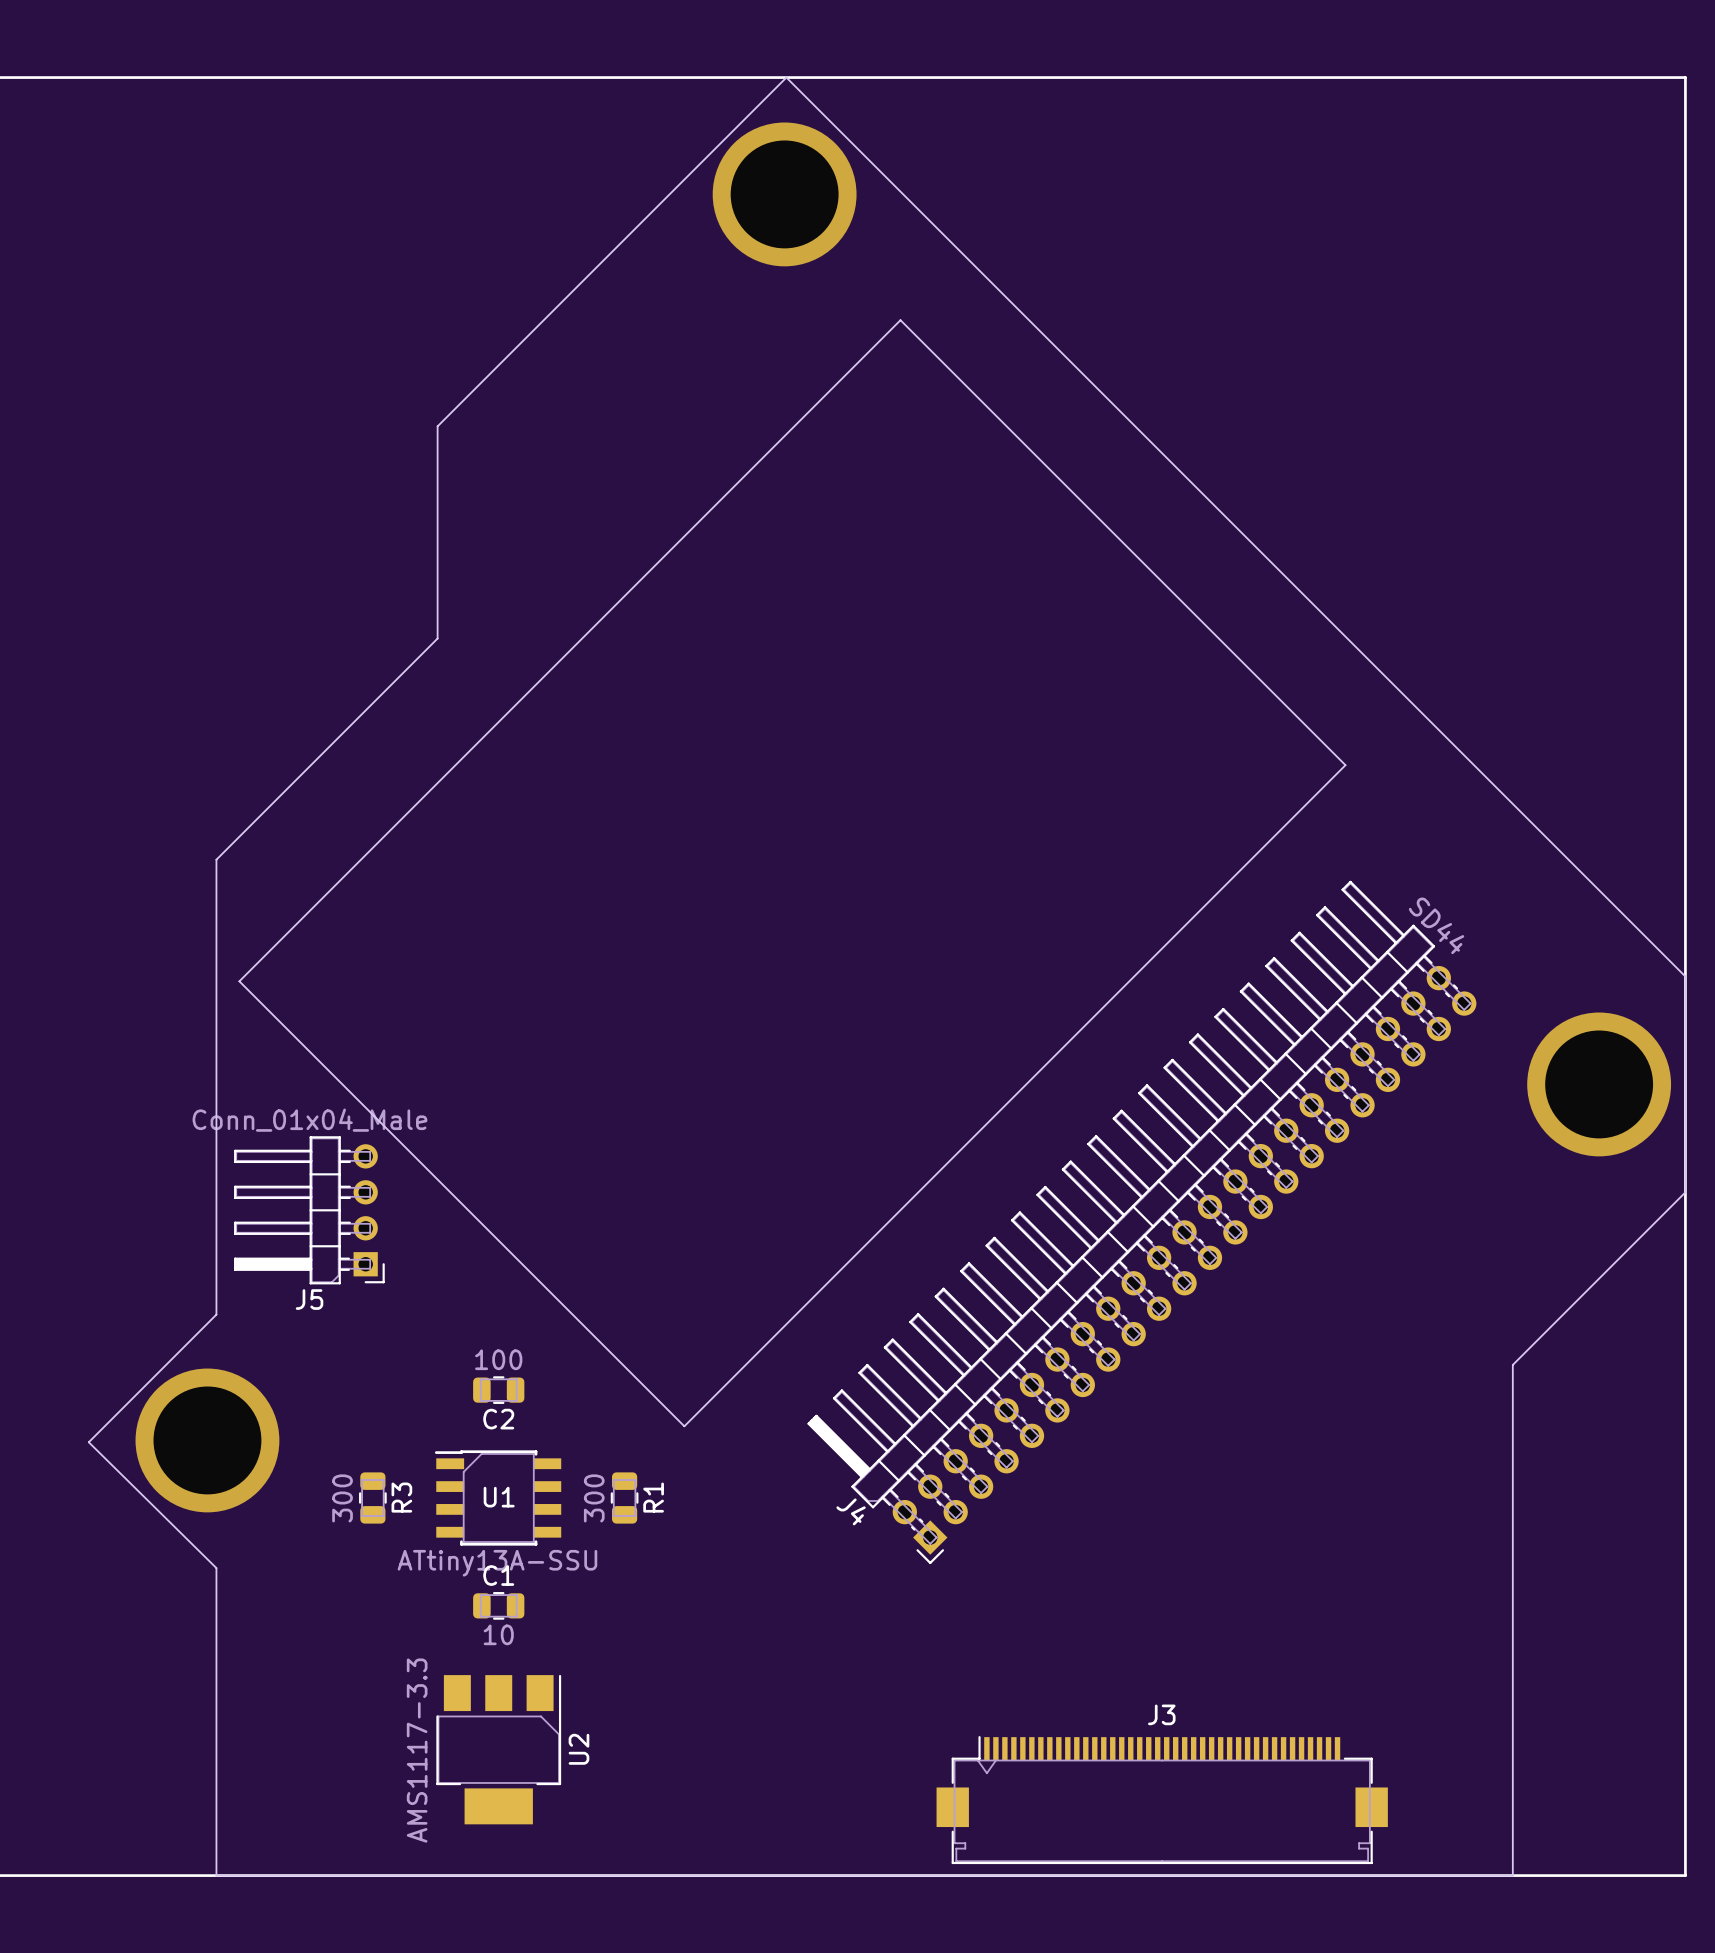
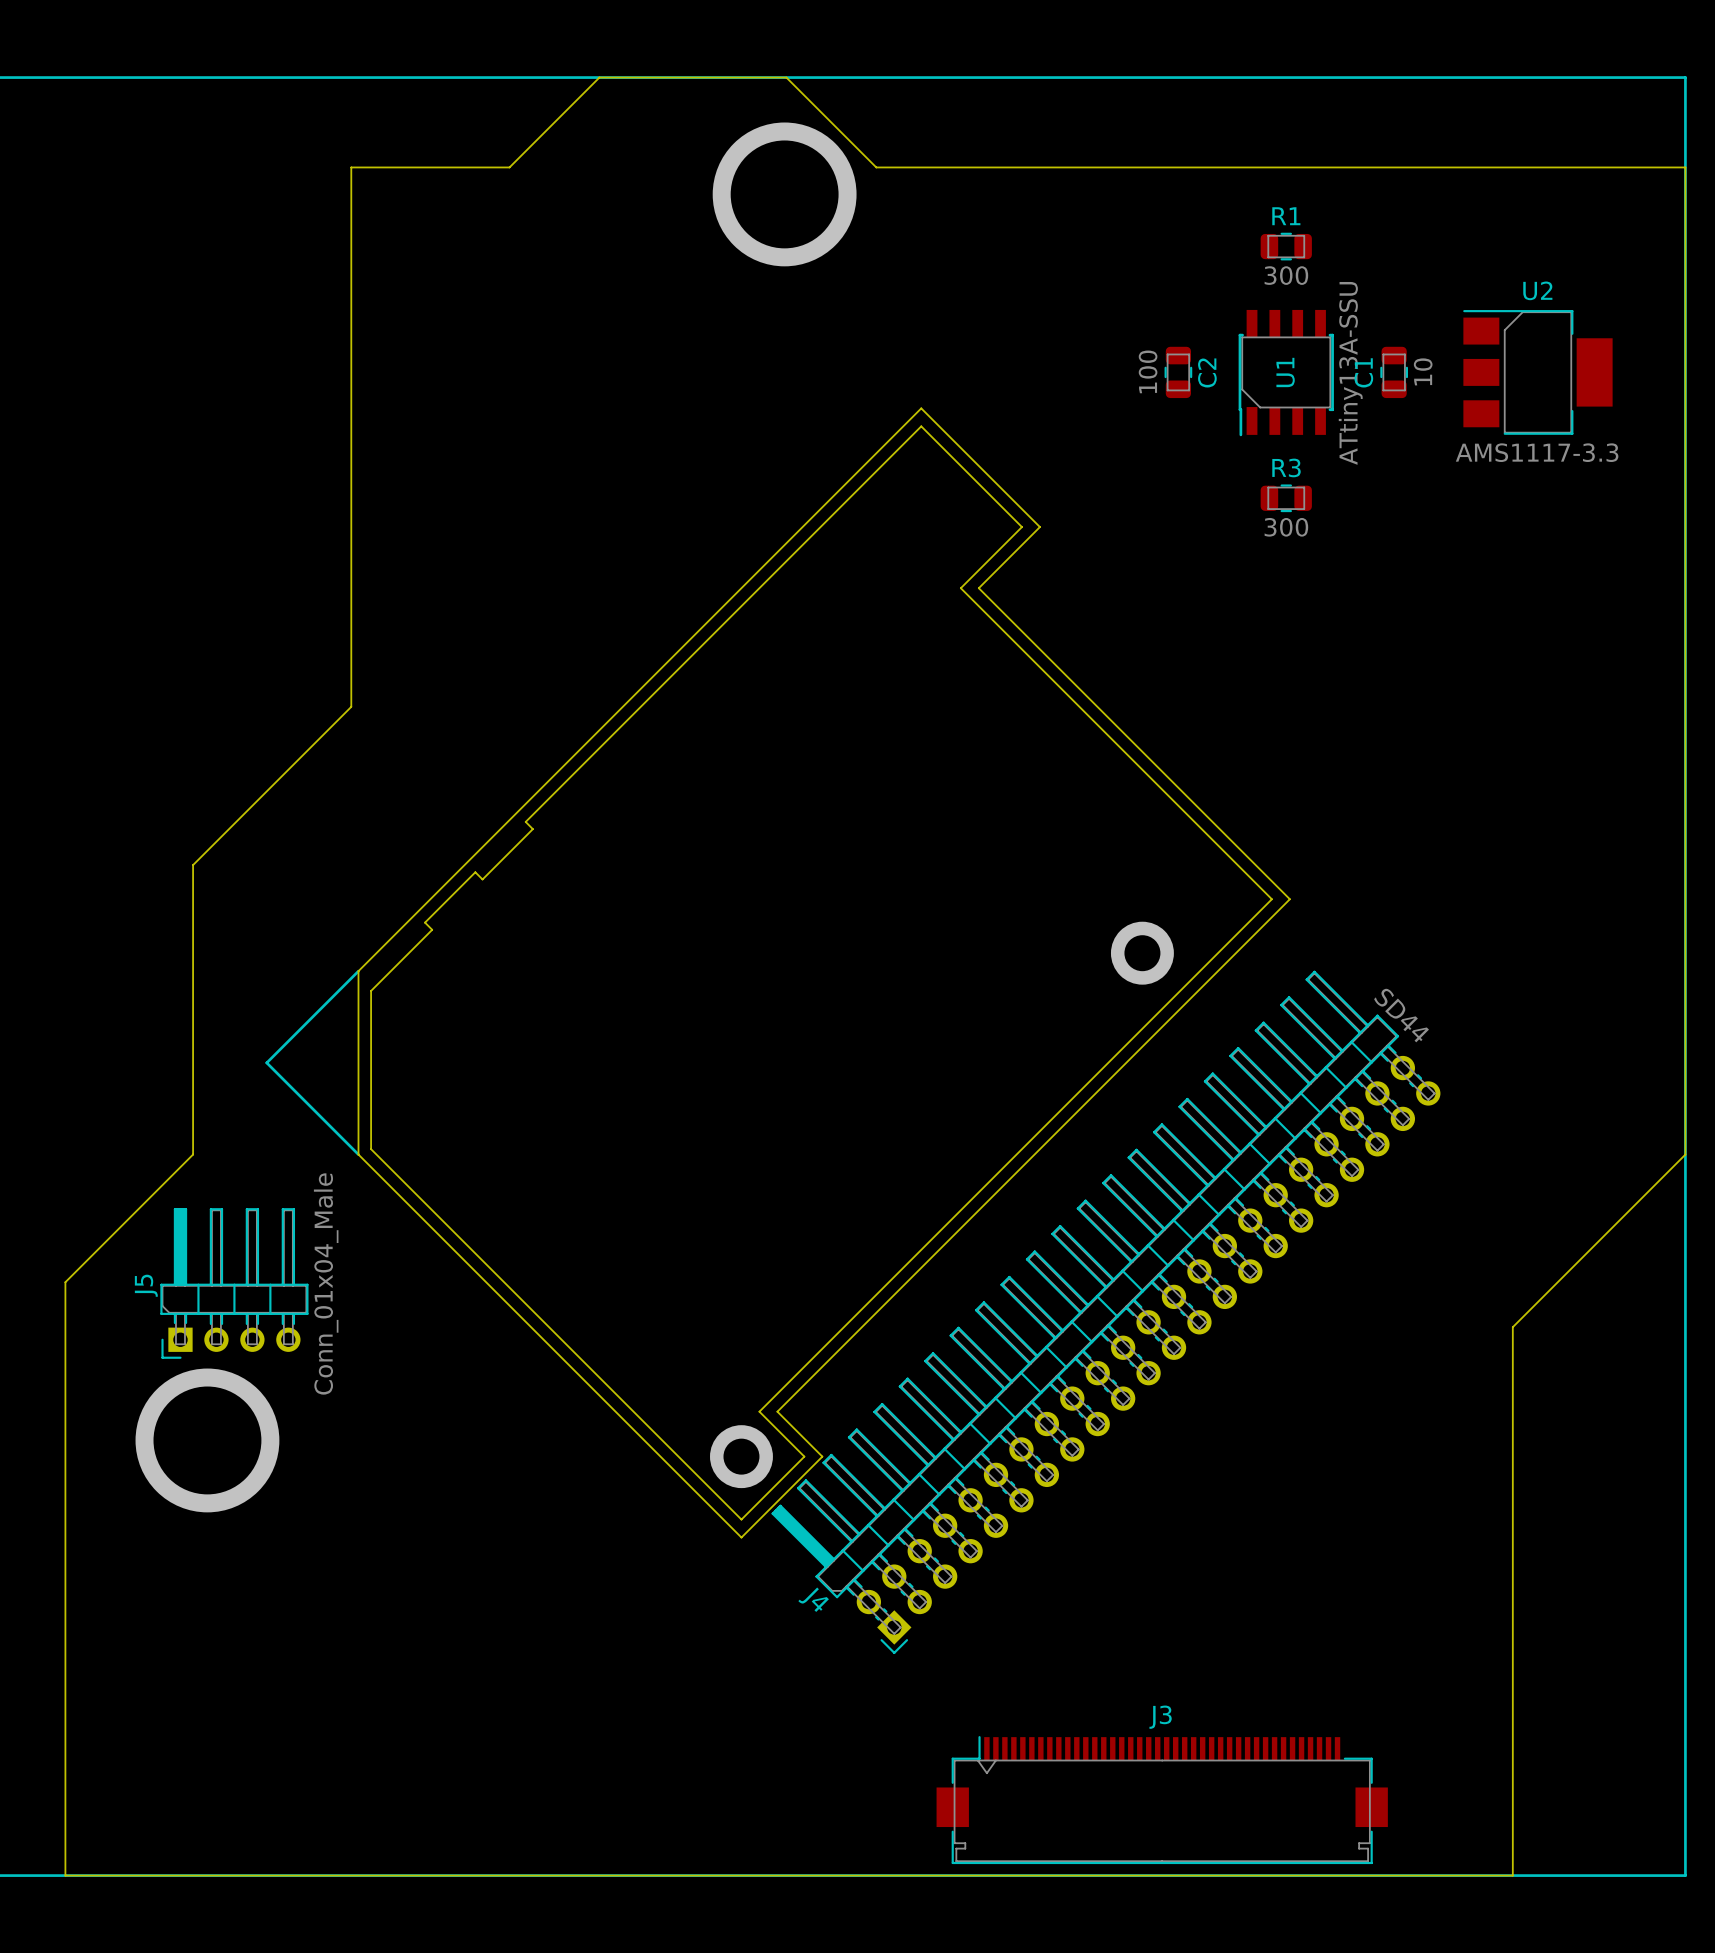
board edge: (786, 77) (437, 426) (437, 638) (216, 859) (216, 1314) (88, 1442) (216, 1568) (216, 1875) -> (786, 77) (599, 77) (509, 167) (351, 167) (351, 706) (193, 865) (193, 1154) (65, 1282) (65, 1875) (216, 1875)
board edge: (876, 167) (1685, 976) -> (876, 167) (1685, 167) (1685, 976)
board edge: (900, 320) (239, 981) (684, 1426) (1345, 765) (900, 320) -> (921, 408) (358, 971) (358, 1154) (741, 1537) (822, 1456) (777, 1411) (1289, 899) (978, 588) (1039, 527) (921, 408)
board edge: none -> (921, 426) (525, 821) (532, 829) (482, 879) (475, 872) (425, 922) (432, 929) (371, 990) (371, 1149) (741, 1519) (804, 1456) (759, 1411) (1271, 899) (960, 588) (1021, 527) (921, 426)
via: none -> (1142, 953)
line: none -> (358, 971) (266, 1062) (358, 1154)
via: (1599, 1084) -> none
board edge: (1685, 1154) (1685, 1192) (1512, 1364) -> (1685, 1154) (1512, 1327) (1512, 1364)
J5 rotation: 0° (309, 1210) -> 90° clockwise (234, 1283)
J5 position: (309, 1210) -> (234, 1283)
J4 position: (1141, 1222) -> (1105, 1312)
C2 value position: 100 (498, 1359) -> 100 (1148, 371)
C2 rotation: 0° (498, 1390) -> 90° clockwise (1178, 372)
C2 position: (498, 1390) -> (1178, 372)
C2 name position: C2 (498, 1419) -> C2 (1207, 372)
via: none -> (741, 1456)
R3 rotation: 0° (372, 1497) -> 90° clockwise (1286, 498)
R3 position: (372, 1497) -> (1286, 498)
R3 name position: R3 (401, 1497) -> R3 (1286, 467)
U1 rotation: 0° (498, 1497) -> 90° counterclockwise (1286, 373)
U1 position: (498, 1497) -> (1286, 373)
R1 rotation: 0° (624, 1497) -> 90° clockwise (1286, 246)
R1 position: (624, 1497) -> (1286, 246)
R1 name position: R1 (653, 1497) -> R1 (1286, 216)
R3 value position: 300 (342, 1498) -> 300 (1286, 527)
R1 value position: 300 (594, 1498) -> 300 (1286, 275)
C1 name position: C1 (498, 1575) -> C1 (1363, 372)
C1 rotation: 0° (498, 1605) -> 90° clockwise (1394, 372)
C1 position: (498, 1605) -> (1394, 372)
C1 value position: 10 (498, 1634) -> 10 (1423, 371)
U2 rotation: 0° (498, 1749) -> 90° counterclockwise (1537, 372)
U2 position: (498, 1749) -> (1537, 372)

